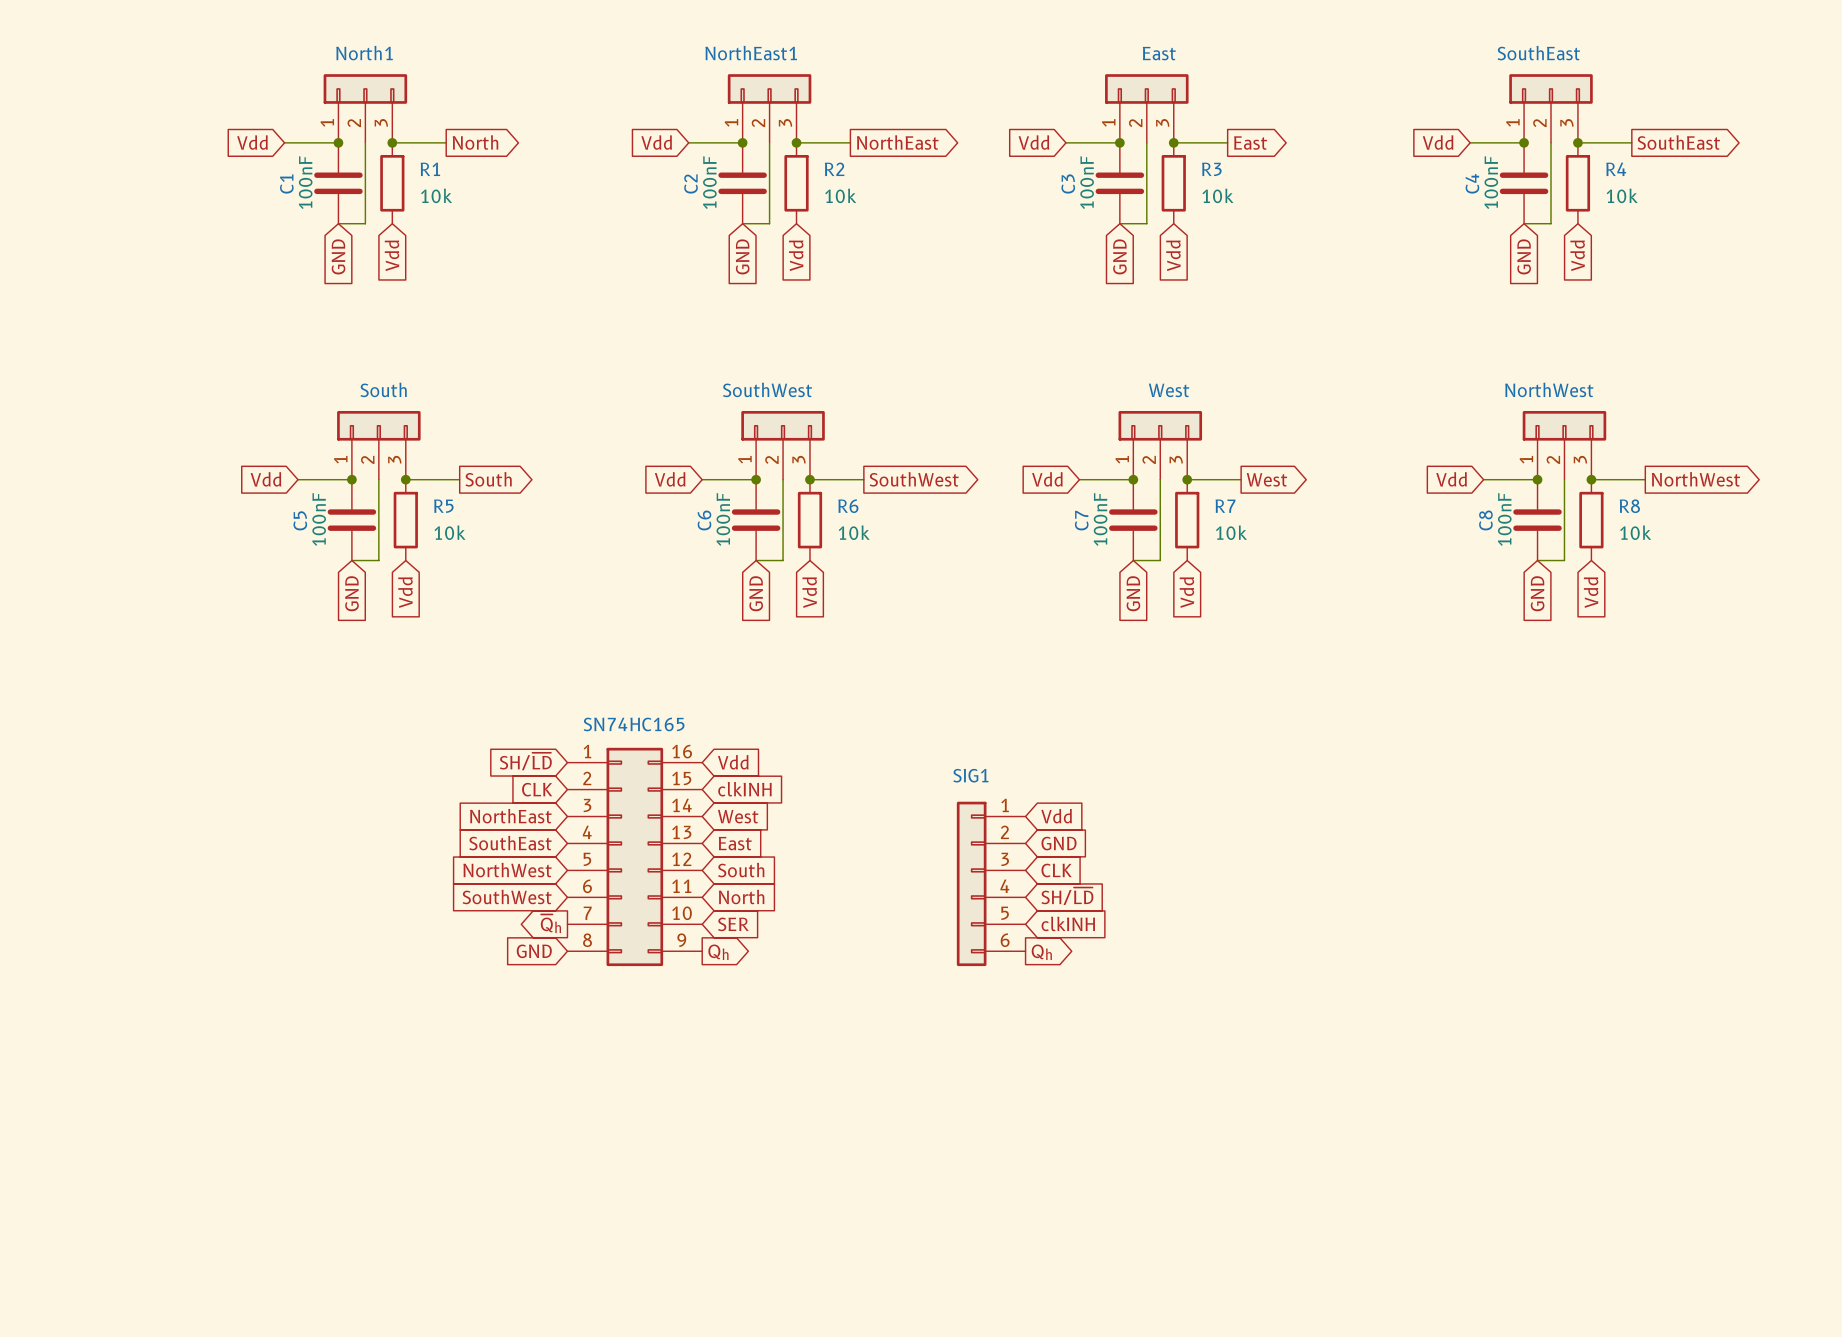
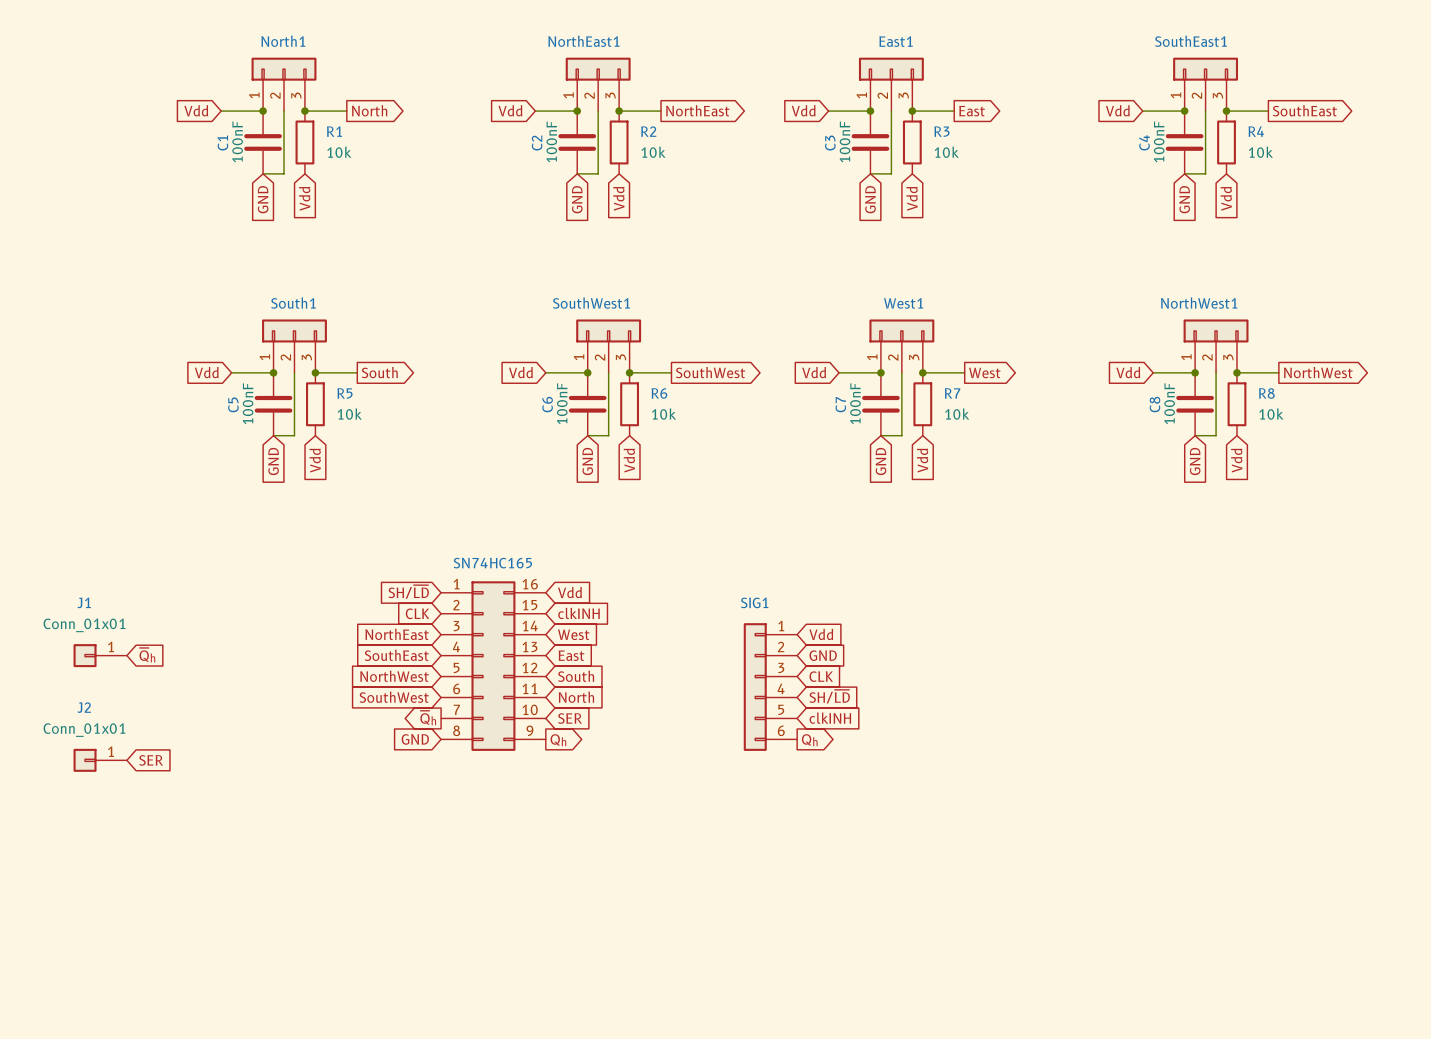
East name: East (1159, 53) -> East1 (896, 41)
SouthEast name: SouthEast (1538, 53) -> SouthEast1 (1191, 41)
South name: South (383, 389) -> South1 (293, 303)
SouthWest name: SouthWest (767, 389) -> SouthWest1 (591, 303)
NorthWest name: NorthWest (1549, 389) -> NorthWest1 (1199, 303)
West name: West (1169, 390) -> West1 (903, 303)
global label: none -> ~{Q}h (147, 655)
J1: none -> Conn_01x01 (100, 655)
J2: none -> Conn_01x01 (100, 760)
global label: none -> SER (151, 760)

